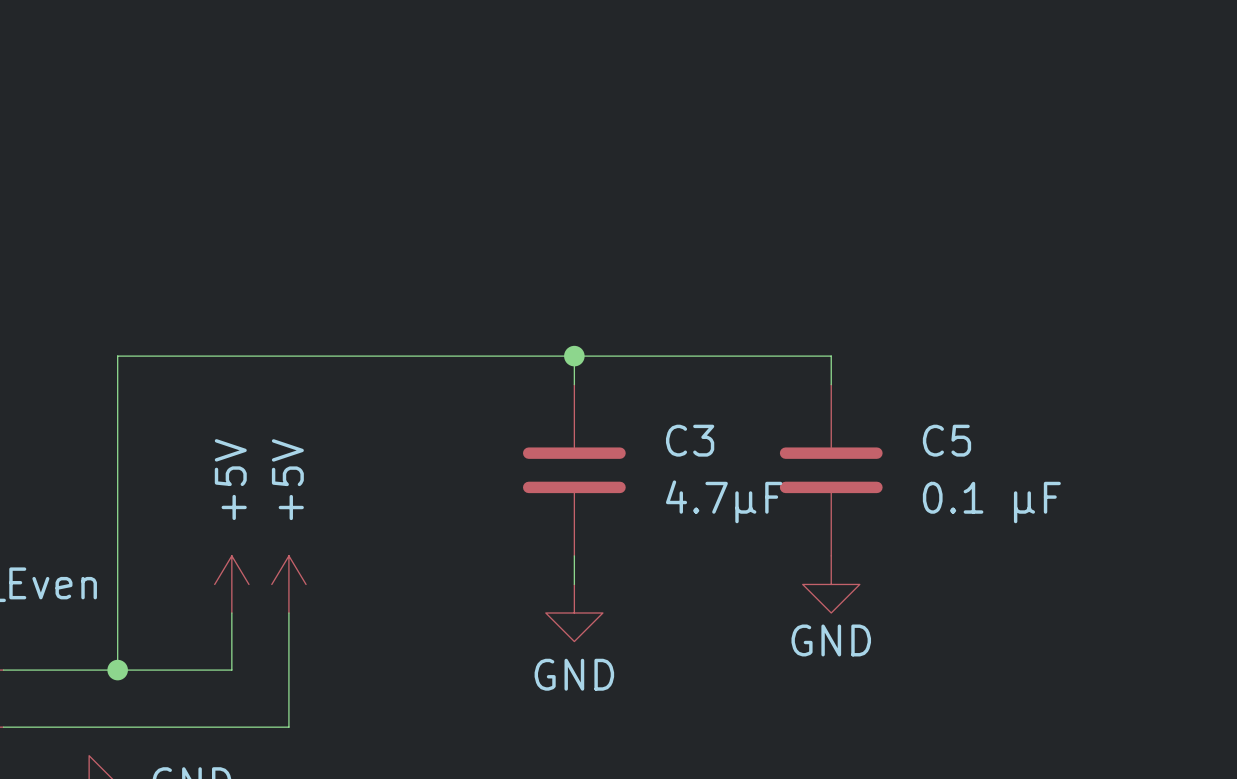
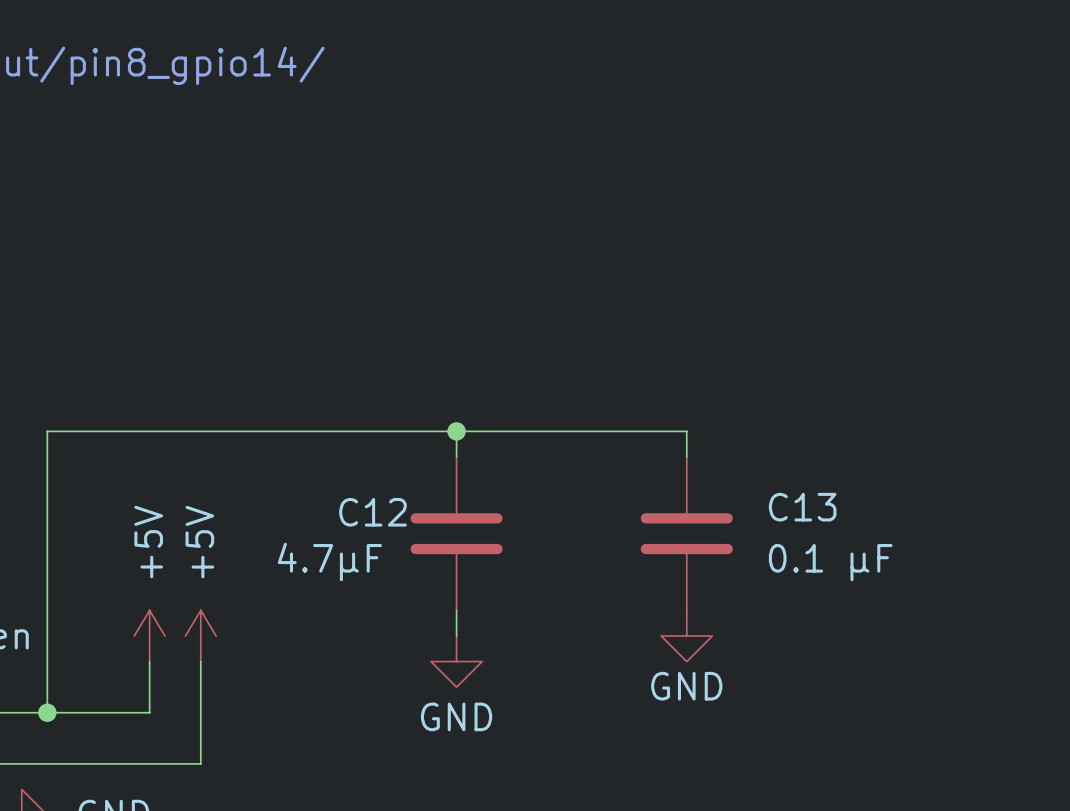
C3 name: C3 (690, 440) -> C12 (372, 512)
C5 name: C5 (946, 440) -> C13 (802, 507)
C3 value position: 4.7µF (724, 501) -> 4.7µF (329, 561)

